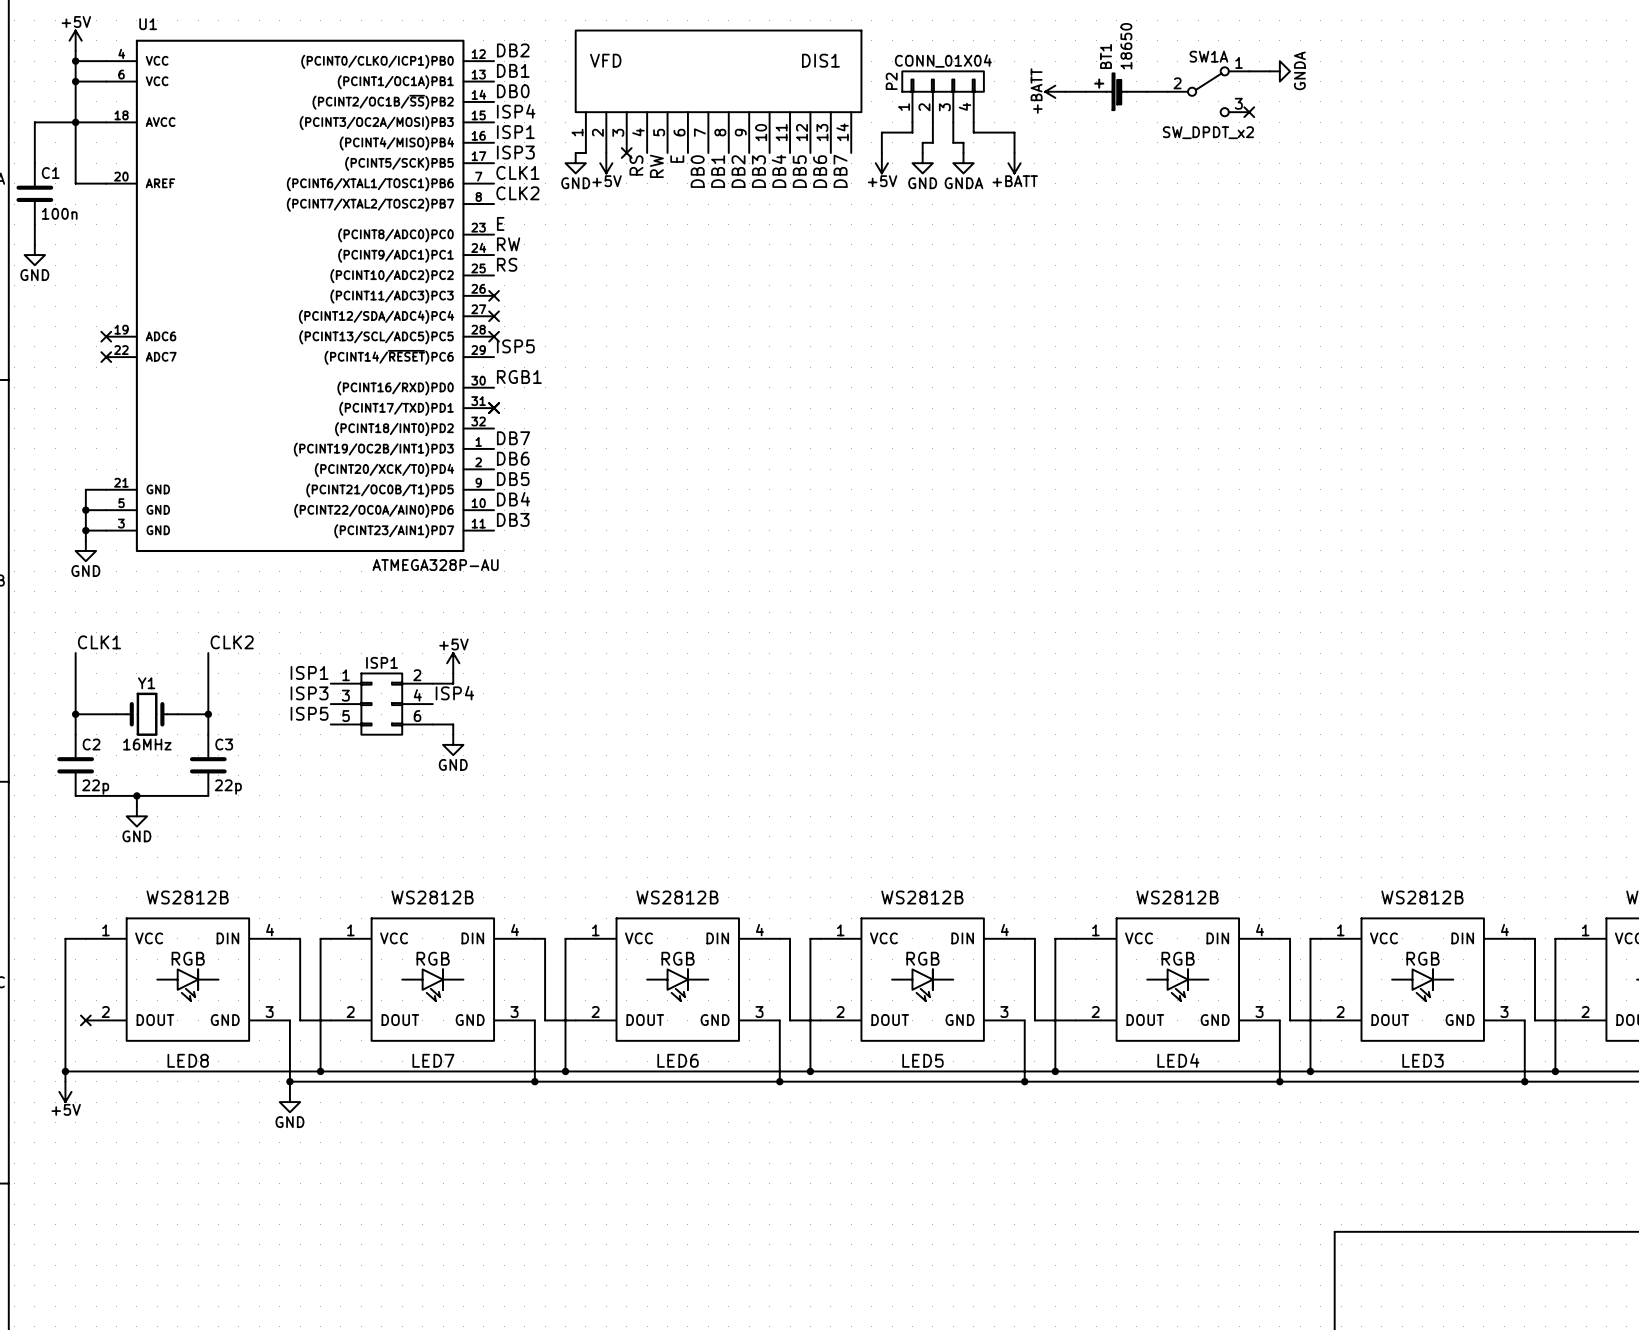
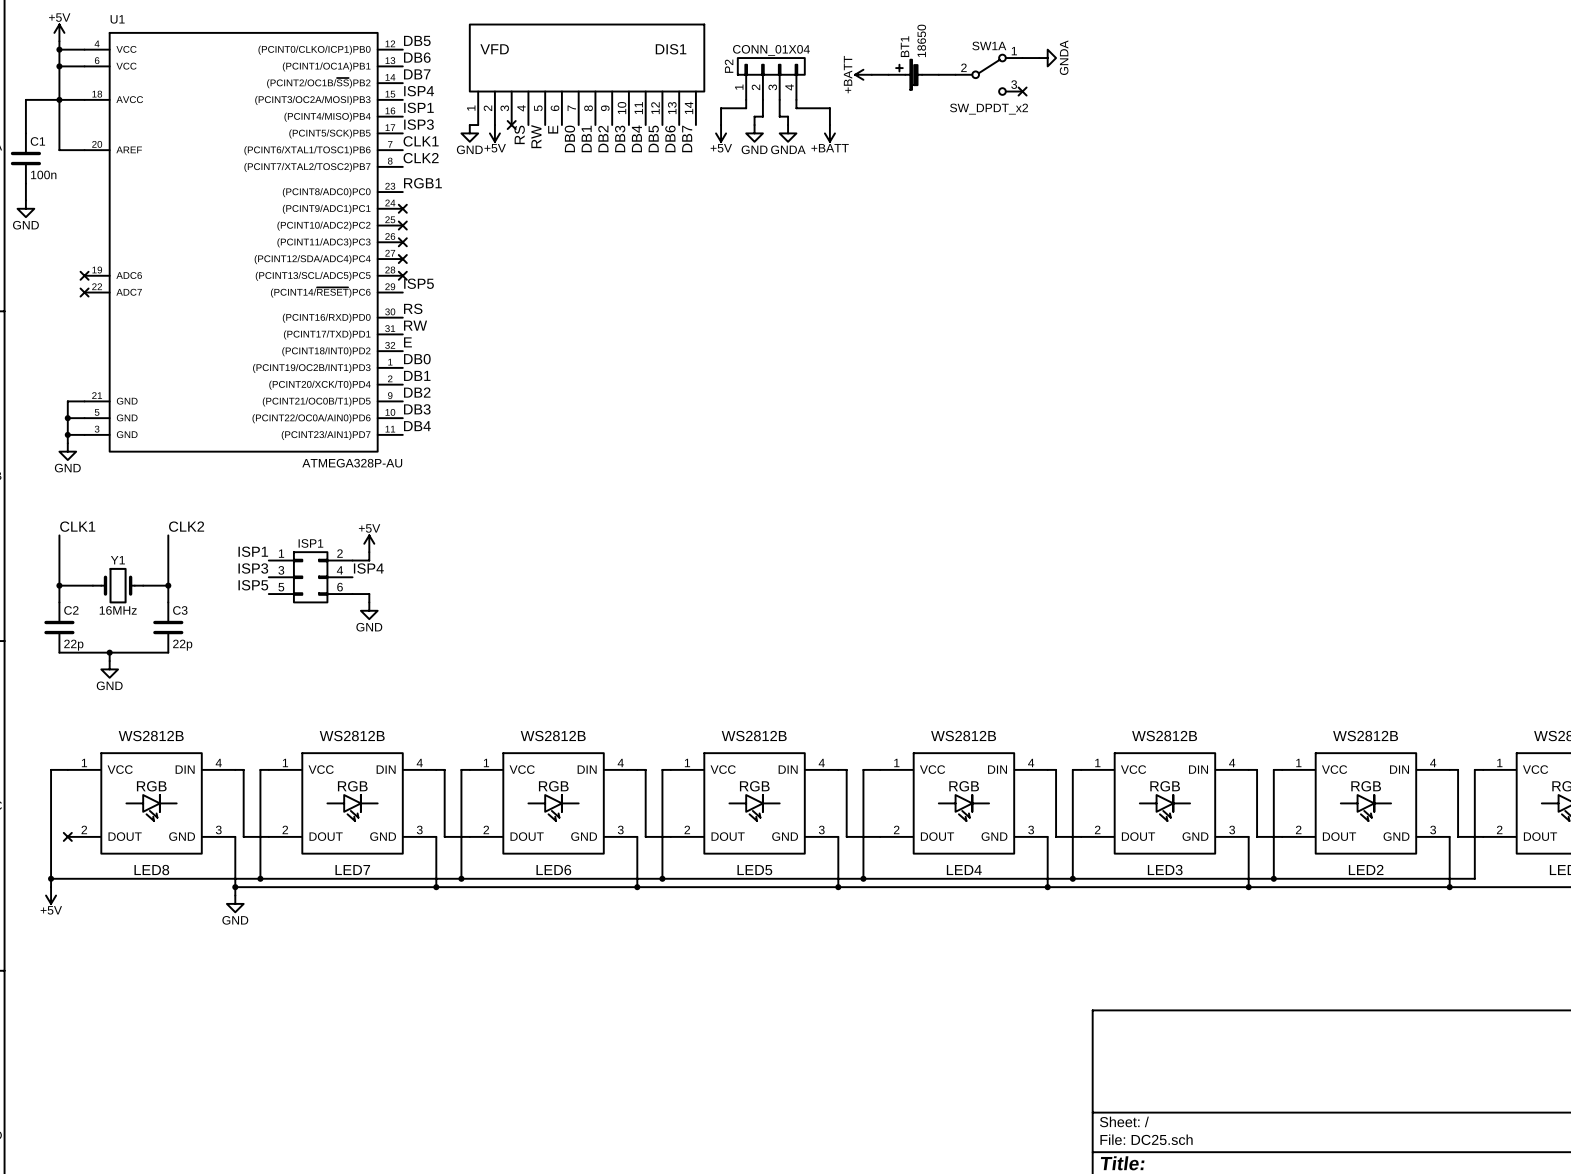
label: DB2 (513, 50) -> DB5 (417, 40)
label: DB1 (513, 70) -> DB6 (417, 57)
label: DB0 (513, 91) -> DB7 (417, 74)
label: E (500, 223) -> RGB1 (422, 183)
label position: RW (508, 244) -> RW (415, 325)
no-connect mark: none -> (402, 208)
label: RS (507, 264) -> none
no-connect mark: none -> (402, 225)
label: RGB1 (519, 377) -> RS (413, 308)
no-connect mark: (494, 408) -> none
label: none -> E (407, 342)
label: DB7 (513, 438) -> DB0 (417, 359)
label: DB6 (513, 458) -> DB1 (417, 375)
label: DB5 (513, 479) -> DB2 (417, 392)
label: DB4 (513, 499) -> DB3 (417, 409)
label: DB3 (513, 519) -> DB4 (417, 426)

